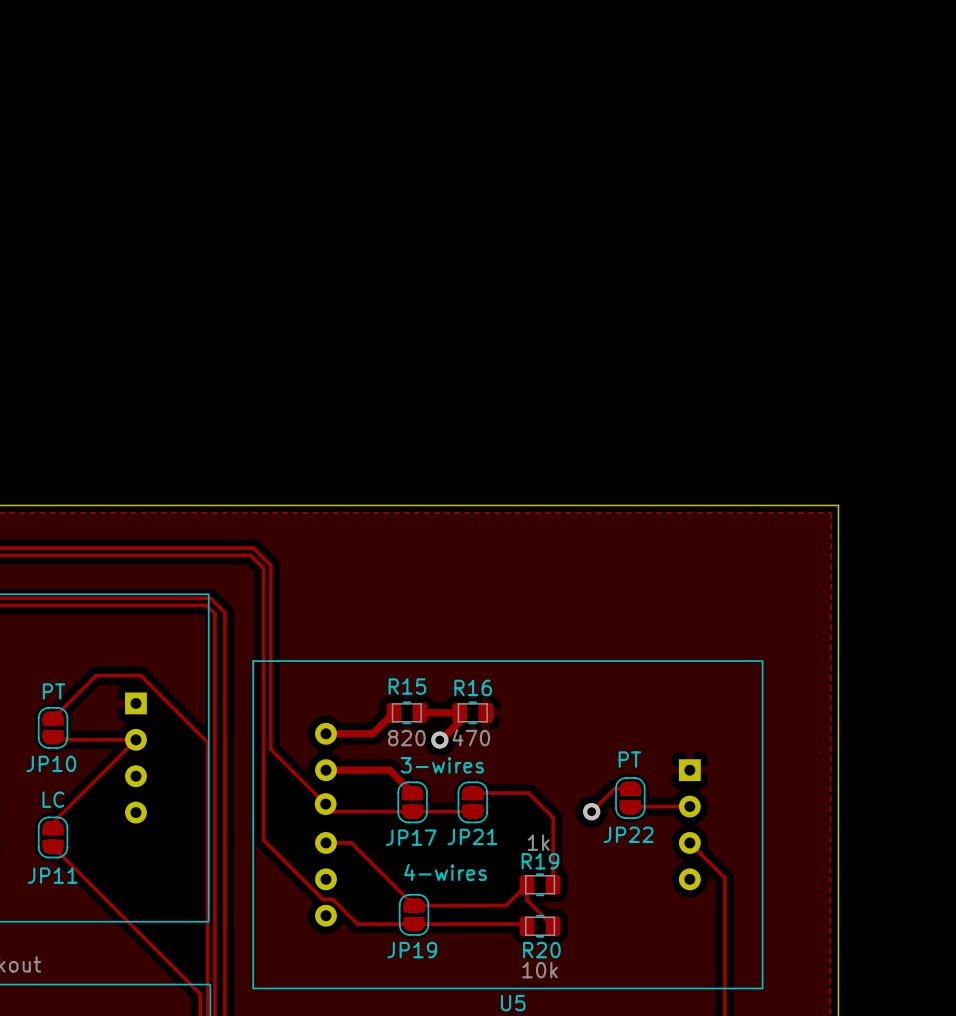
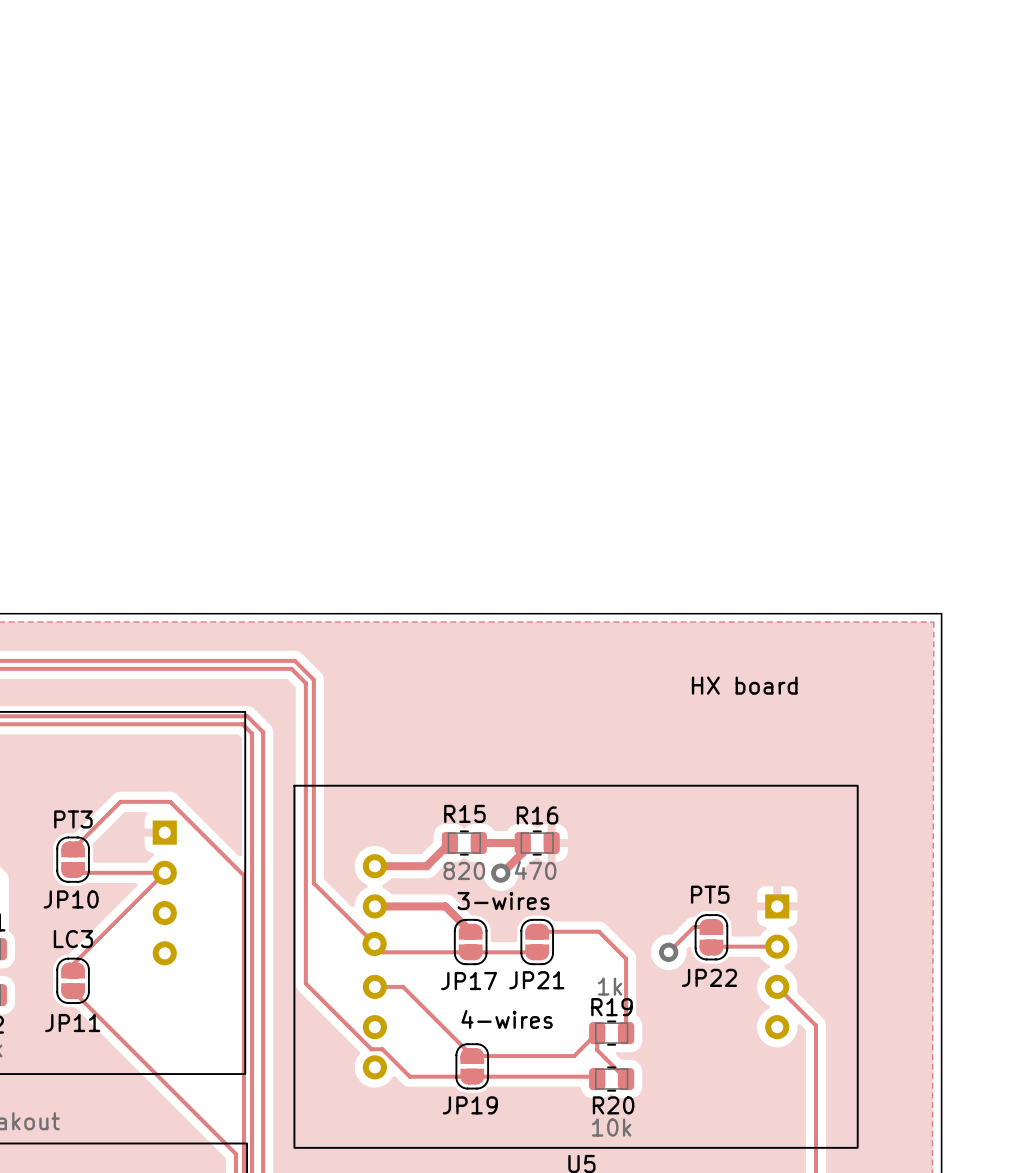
text: none -> HX board (744, 685)
text: PT (54, 691) -> PT3 (73, 819)
text: PT (629, 759) -> PT5 (710, 894)
text: LC (53, 799) -> LC3 (73, 939)

